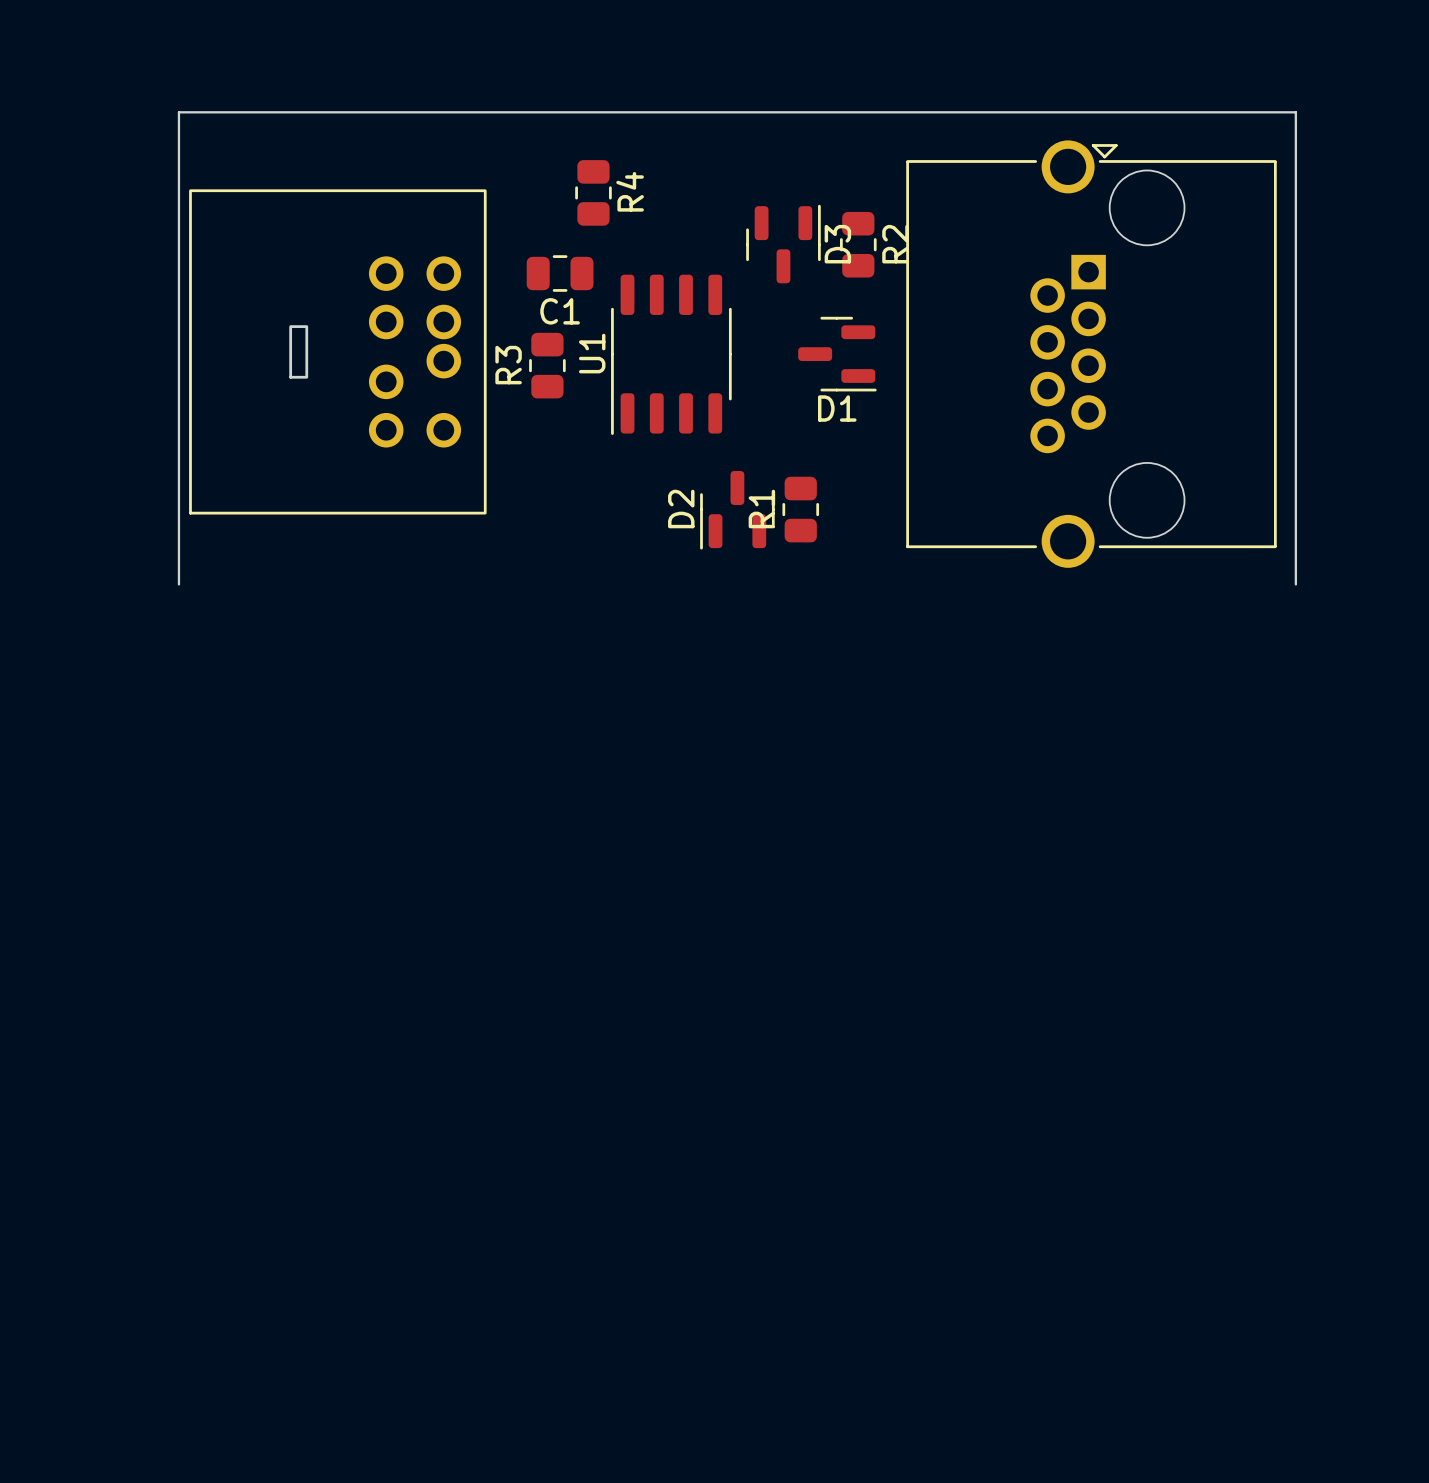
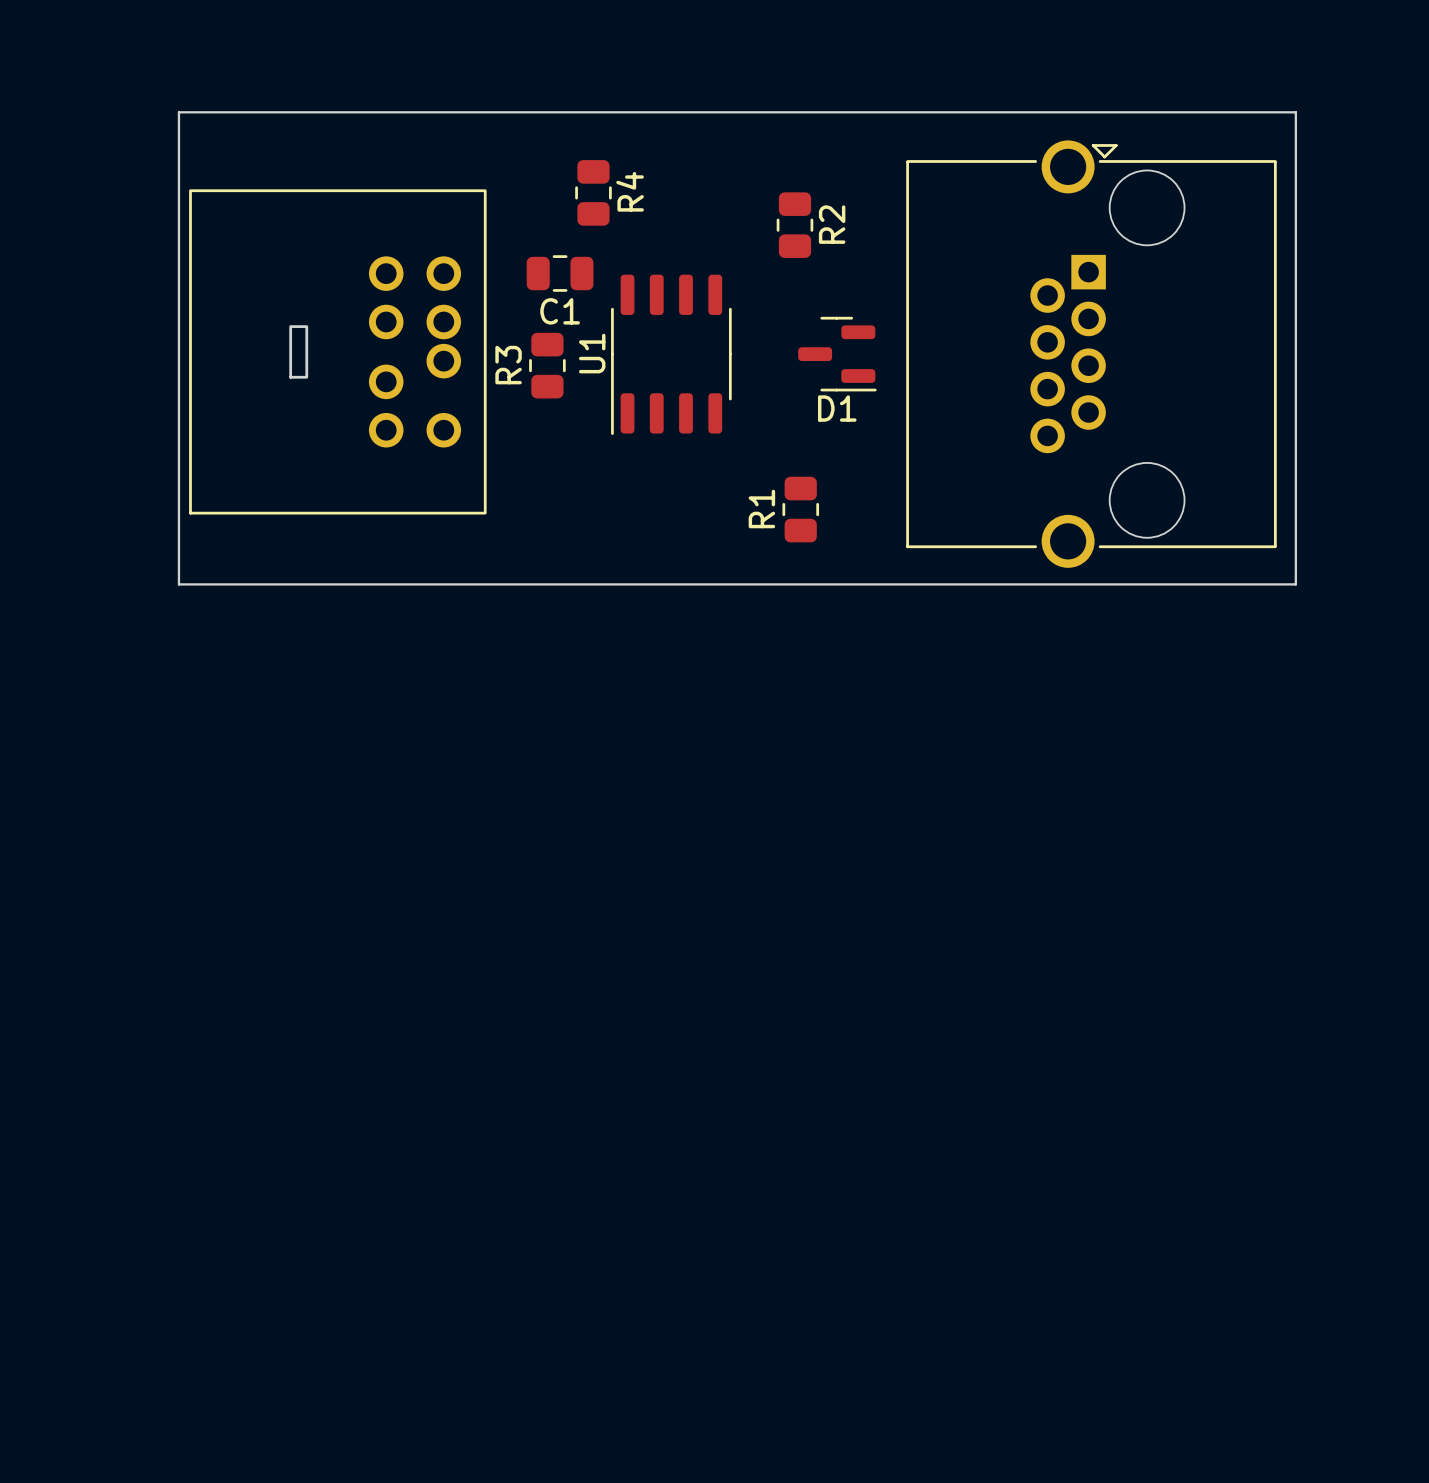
D3: (783, 244) -> none
R2 position: (858, 244) -> (794, 225)
D2: (737, 510) -> none
board edge: none -> (178, 584) (1295, 584)

